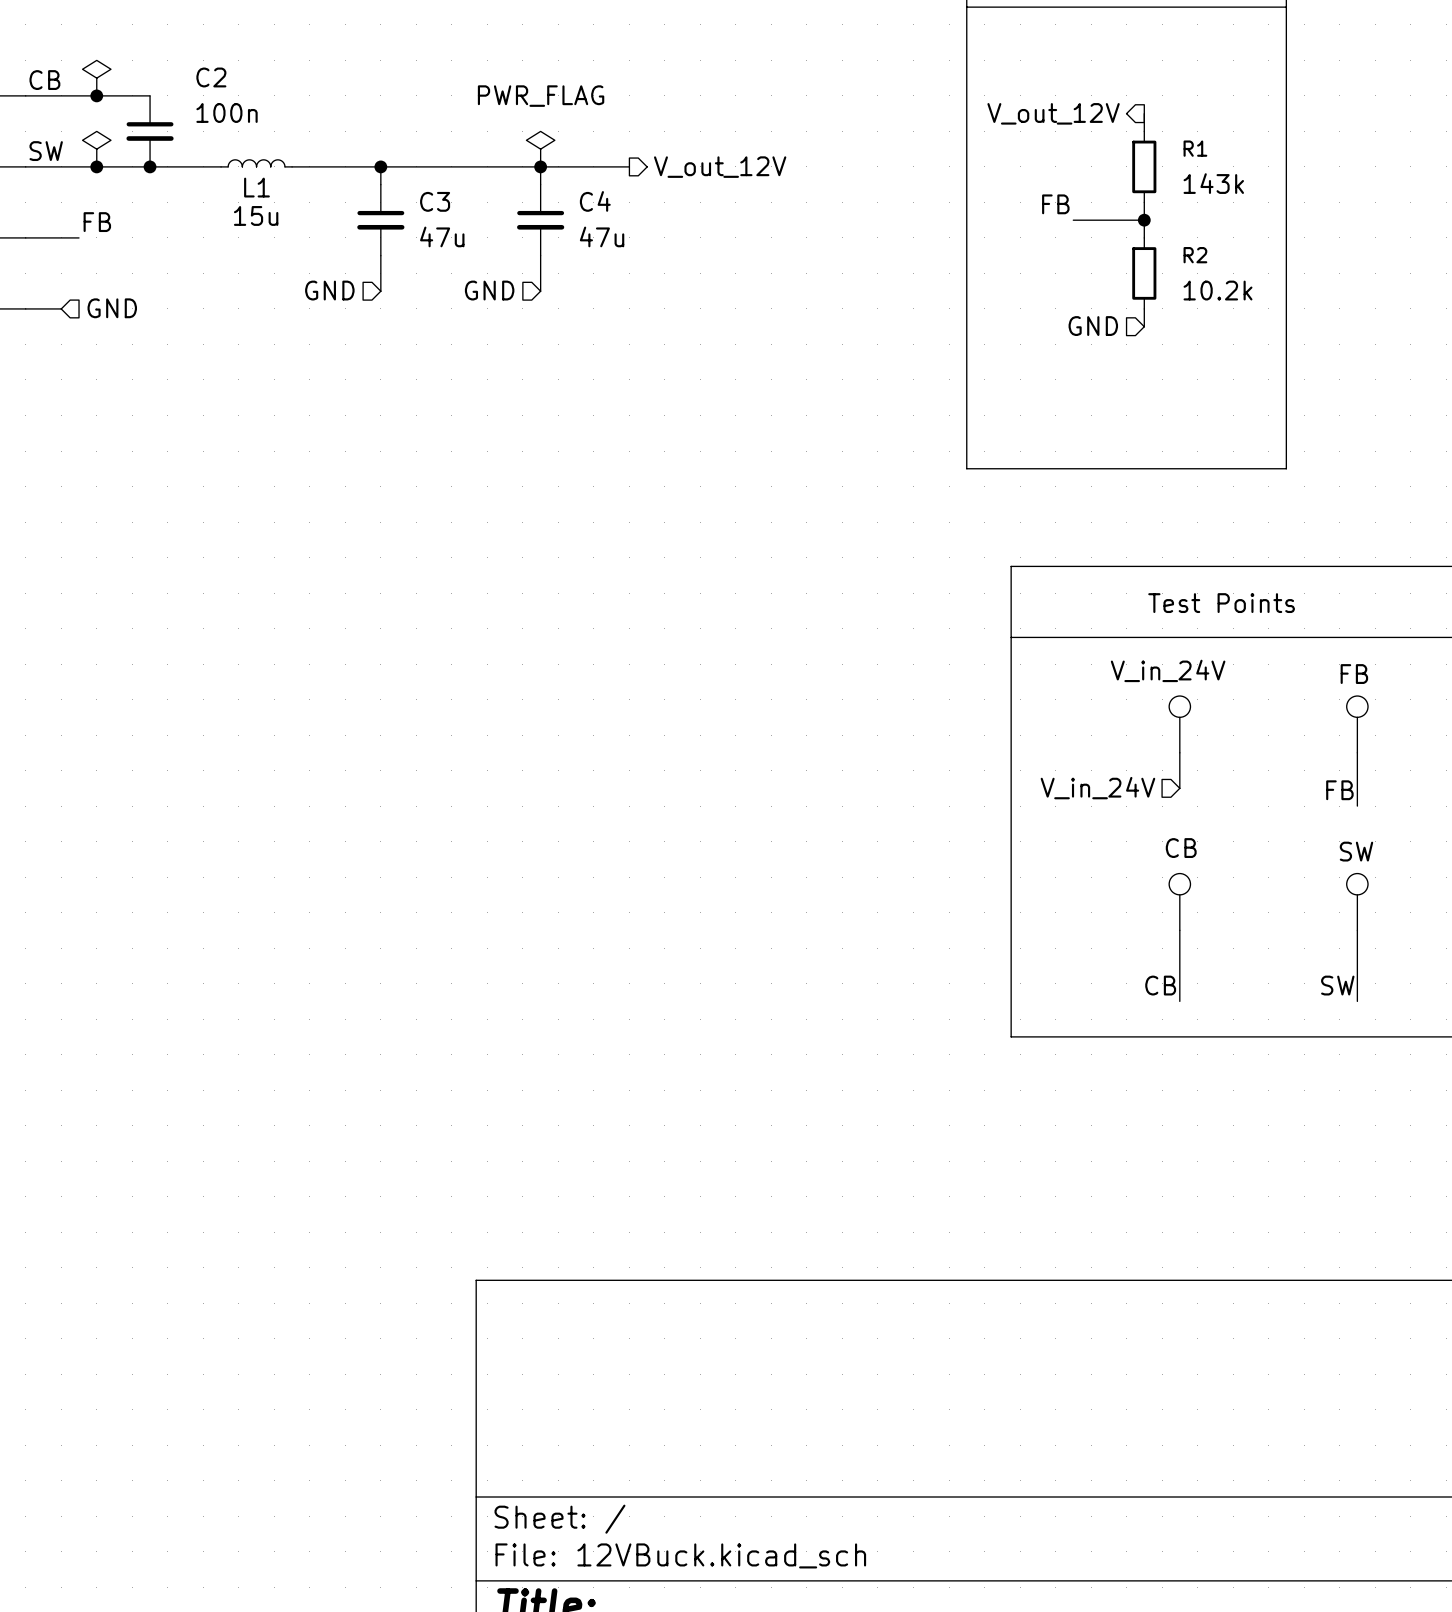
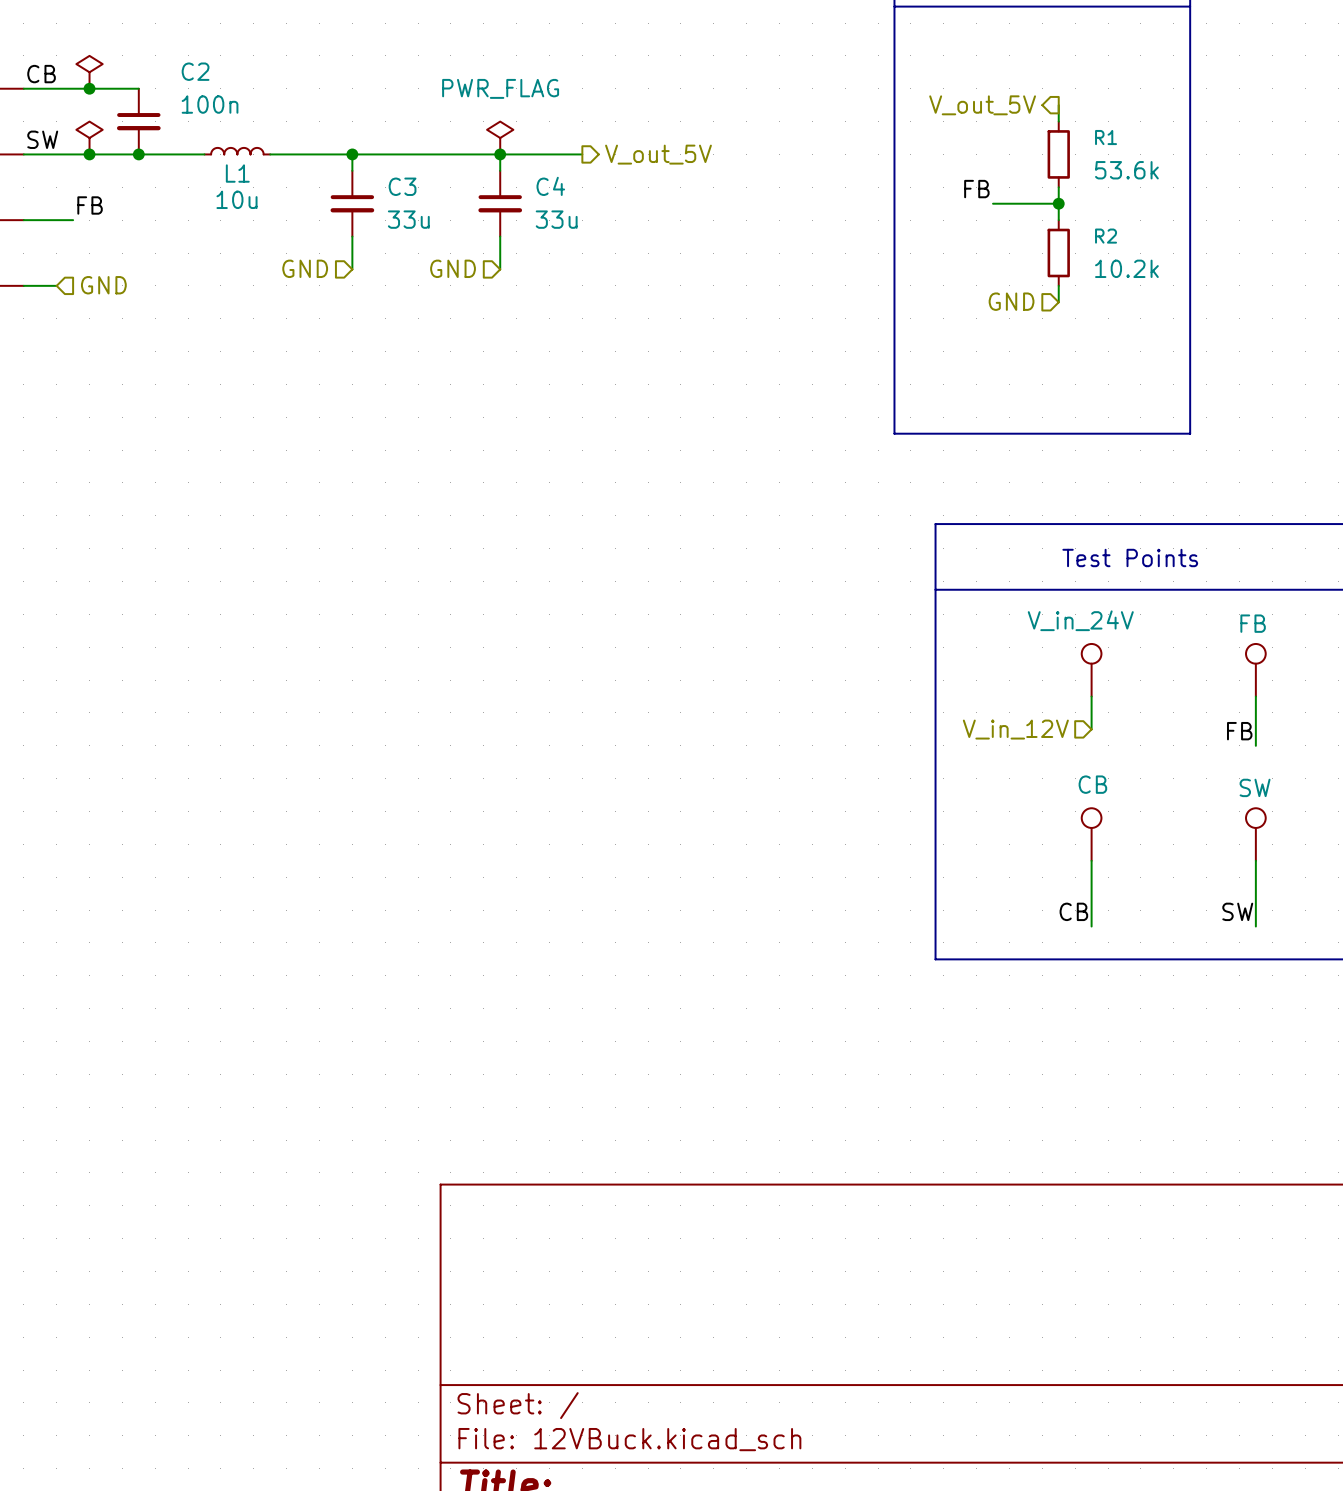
hierarchical label: V_out_12V (1053, 113) -> V_out_5V (982, 105)
hierarchical label: V_out_12V (720, 167) -> V_out_5V (658, 154)
R1 value: 143k (1213, 183) -> 53.6k (1126, 170)
L1 value: 15u (256, 215) -> 10u (236, 199)
C3 value: 47u (442, 236) -> 33u (408, 219)
C4 value: 47u (602, 236) -> 33u (556, 219)
hierarchical label: V_in_24V (1097, 788) -> V_in_12V (1015, 729)

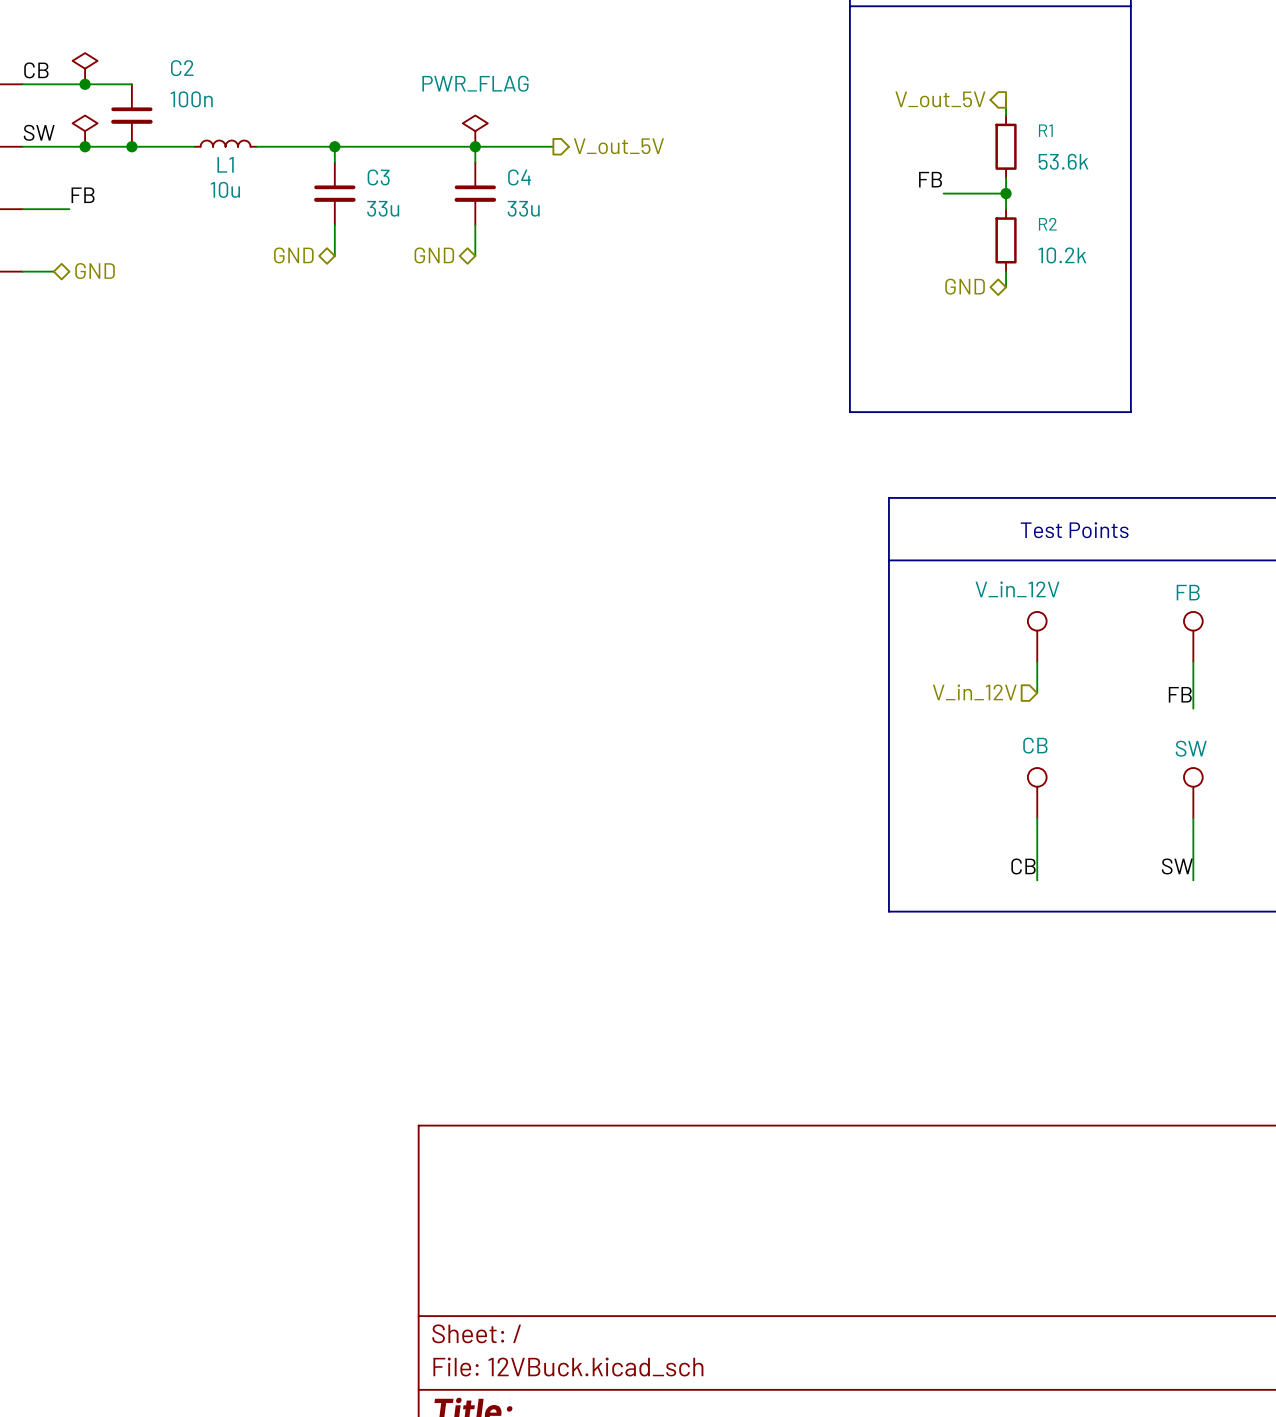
hierarchical label shape: input (305, 268) -> bidirectional (293, 255)
hierarchical label shape: input (453, 268) -> bidirectional (434, 255)
hierarchical label shape: input (103, 285) -> bidirectional (95, 271)
hierarchical label shape: input (1011, 301) -> bidirectional (965, 286)
part value: V_in_24V (1080, 620) -> V_in_12V (1017, 589)

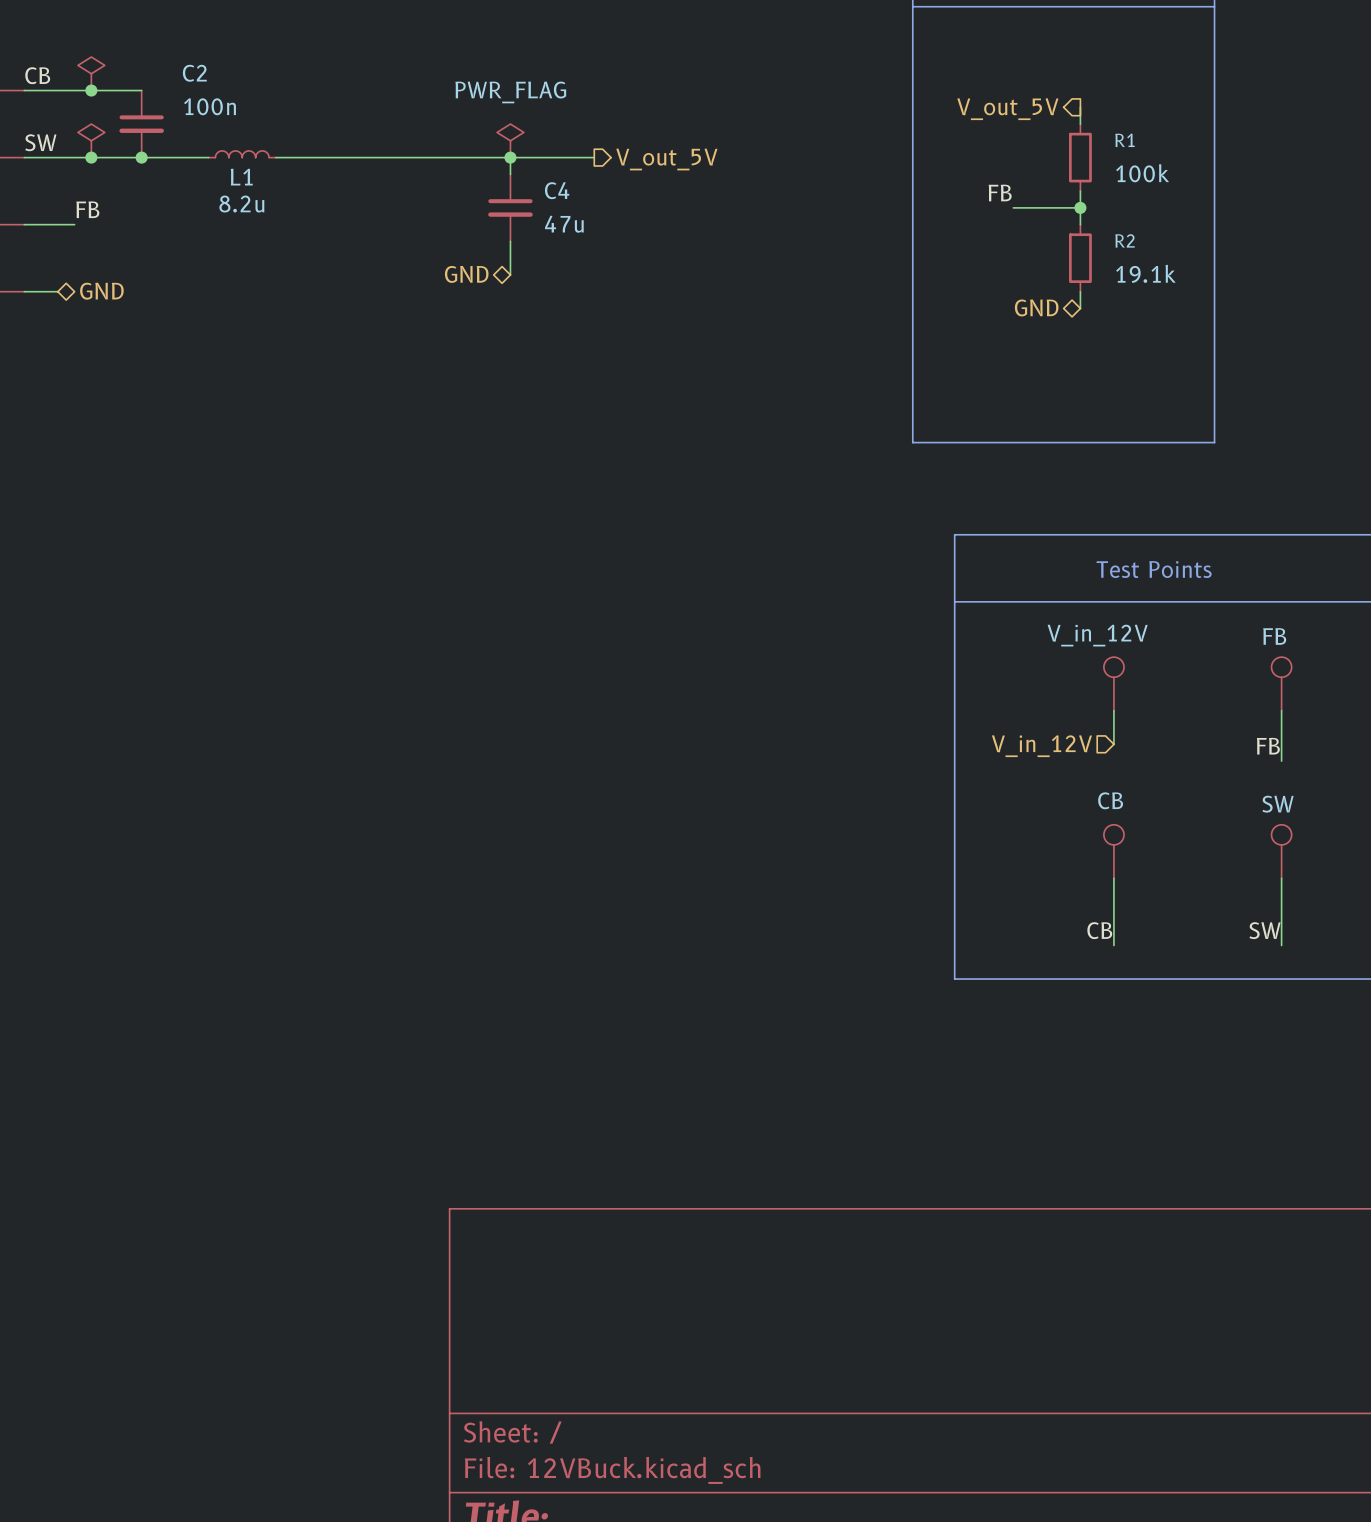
wire: (334, 146) (334, 162) -> none
junction: (334, 146) -> none
R1 value: 53.6k (1063, 161) -> 100k (1142, 173)
L1 value: 10u (225, 189) -> 8.2u (241, 204)
C3: 33u (334, 193) -> none
C4 value: 33u (523, 208) -> 47u (564, 224)
wire: (334, 224) (334, 256) -> none
hierarchical label: GND (293, 255) -> none
R2 value: 10.2k (1062, 255) -> 19.1k (1145, 273)

